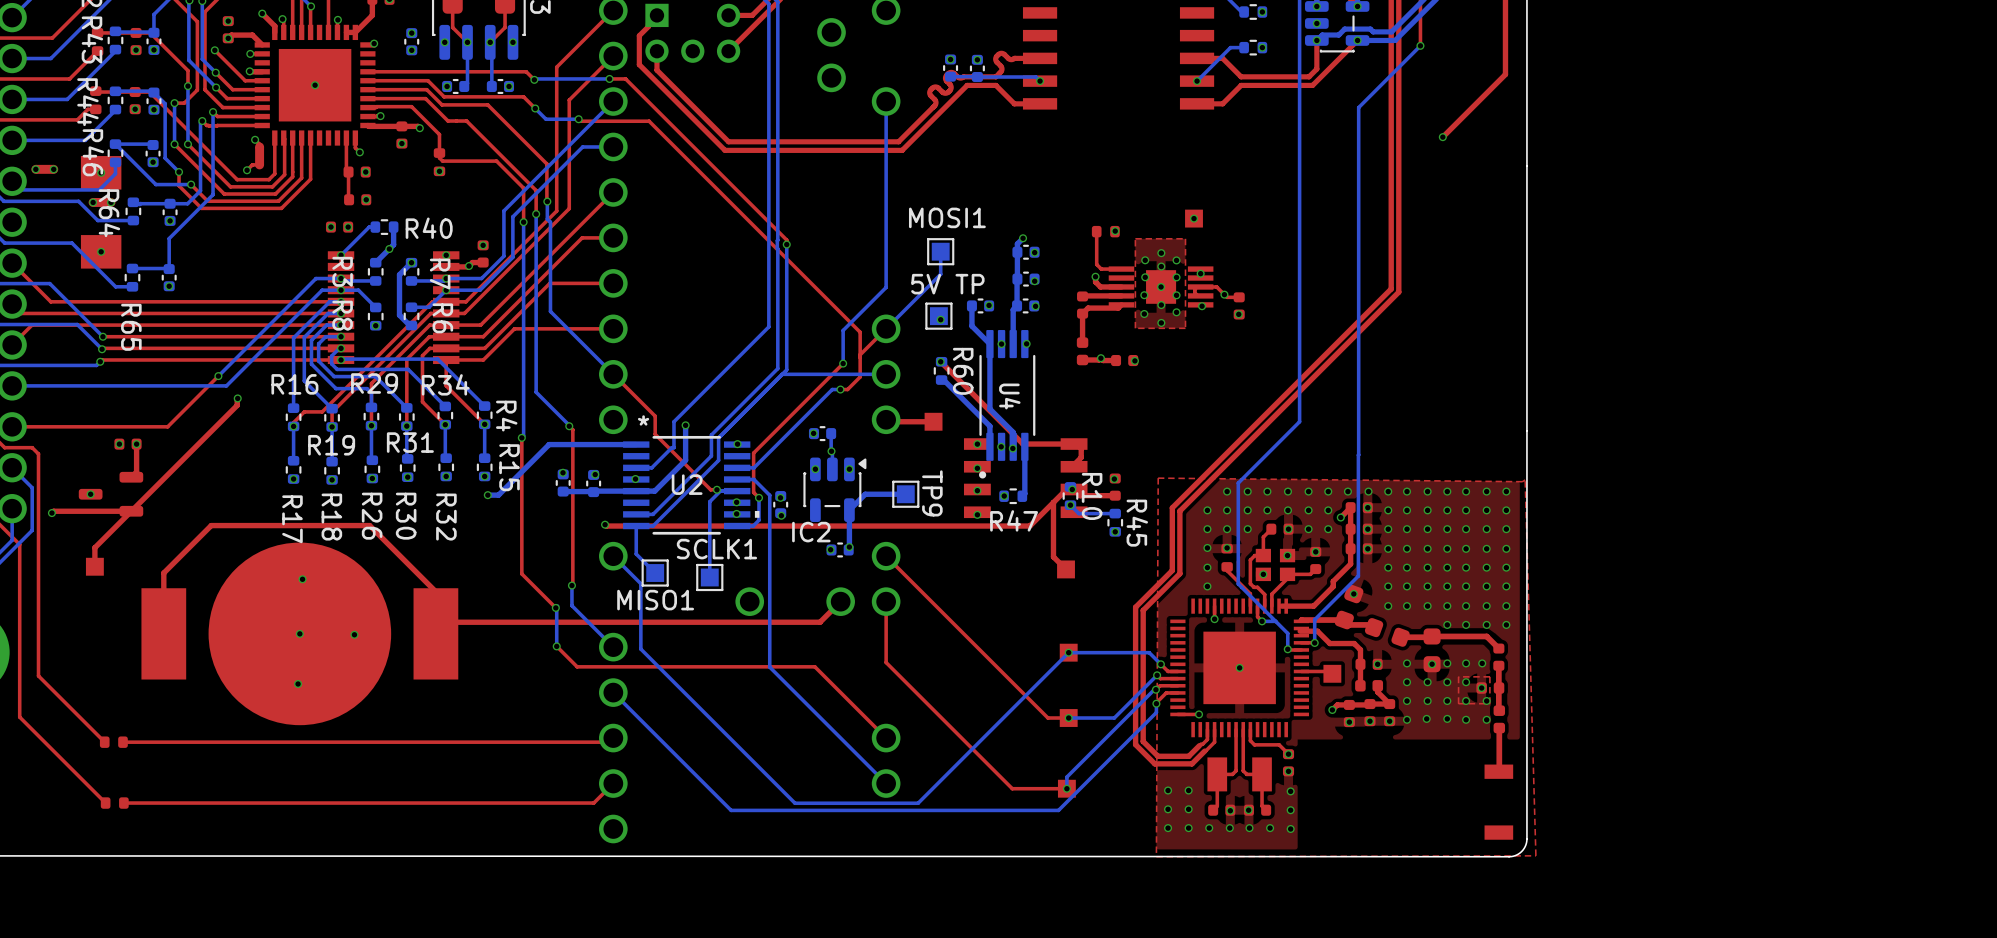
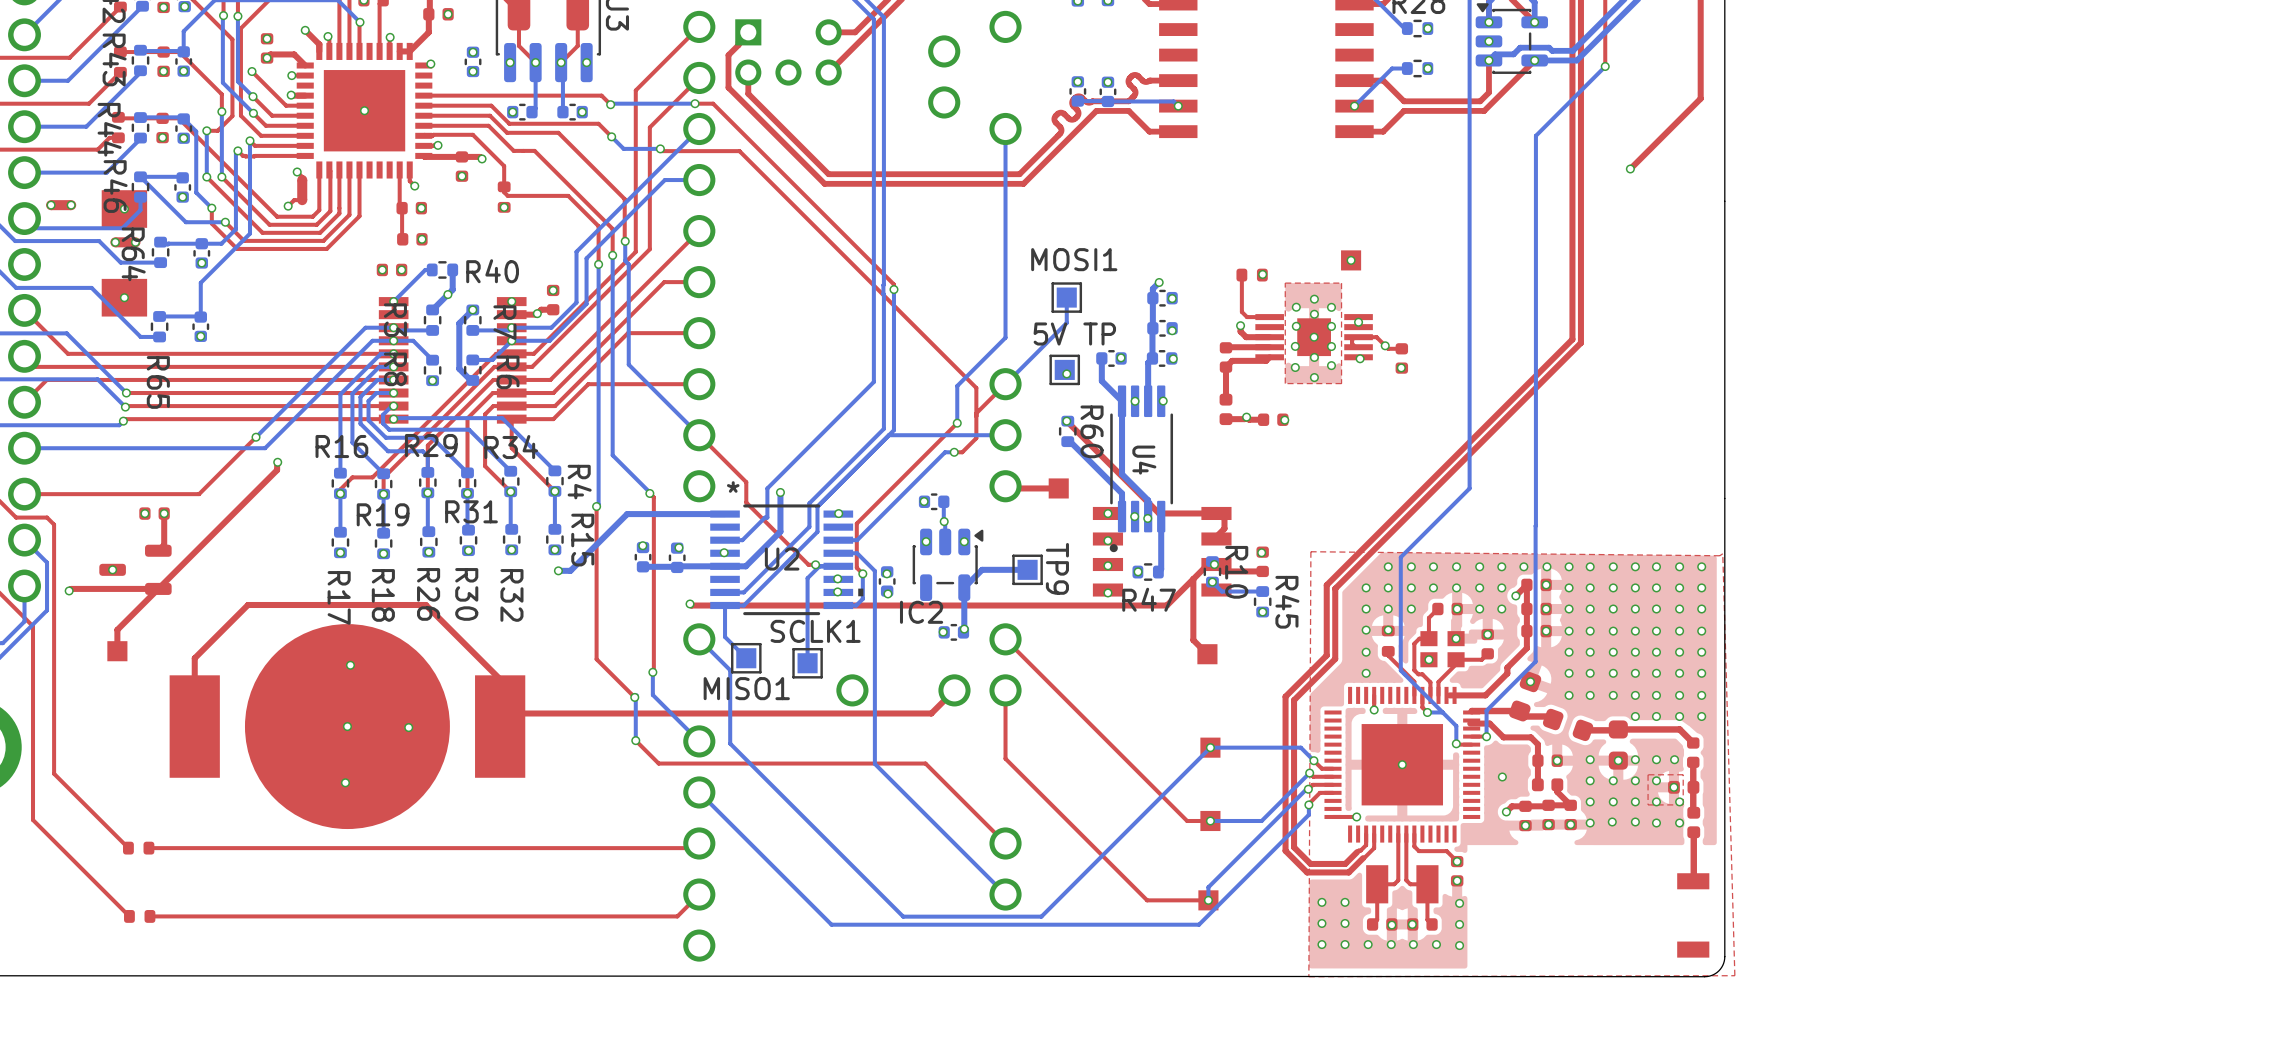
top track: (1301, 671) (1330, 671) (1332, 673) -> none
part: (1332, 673) -> none
via: none -> (1502, 776)

